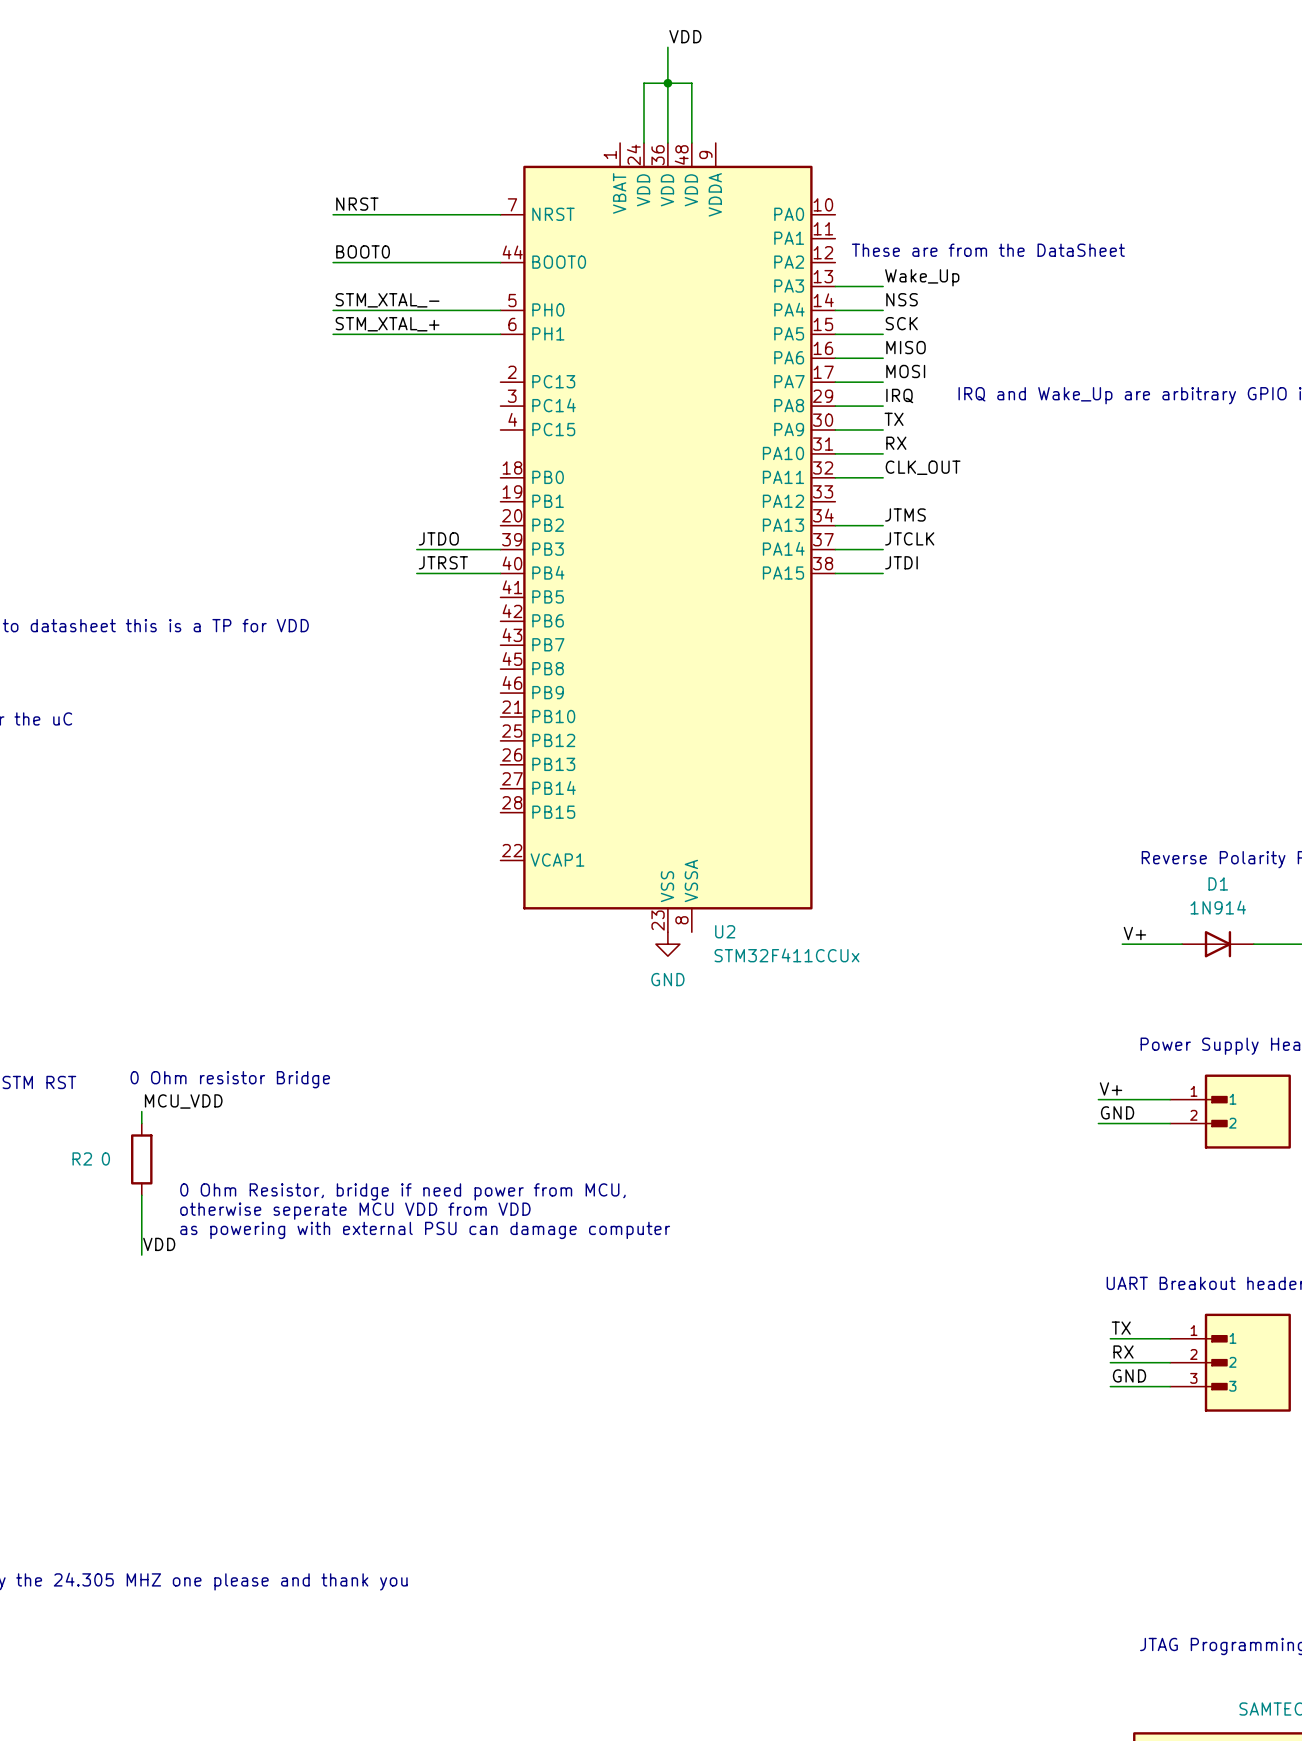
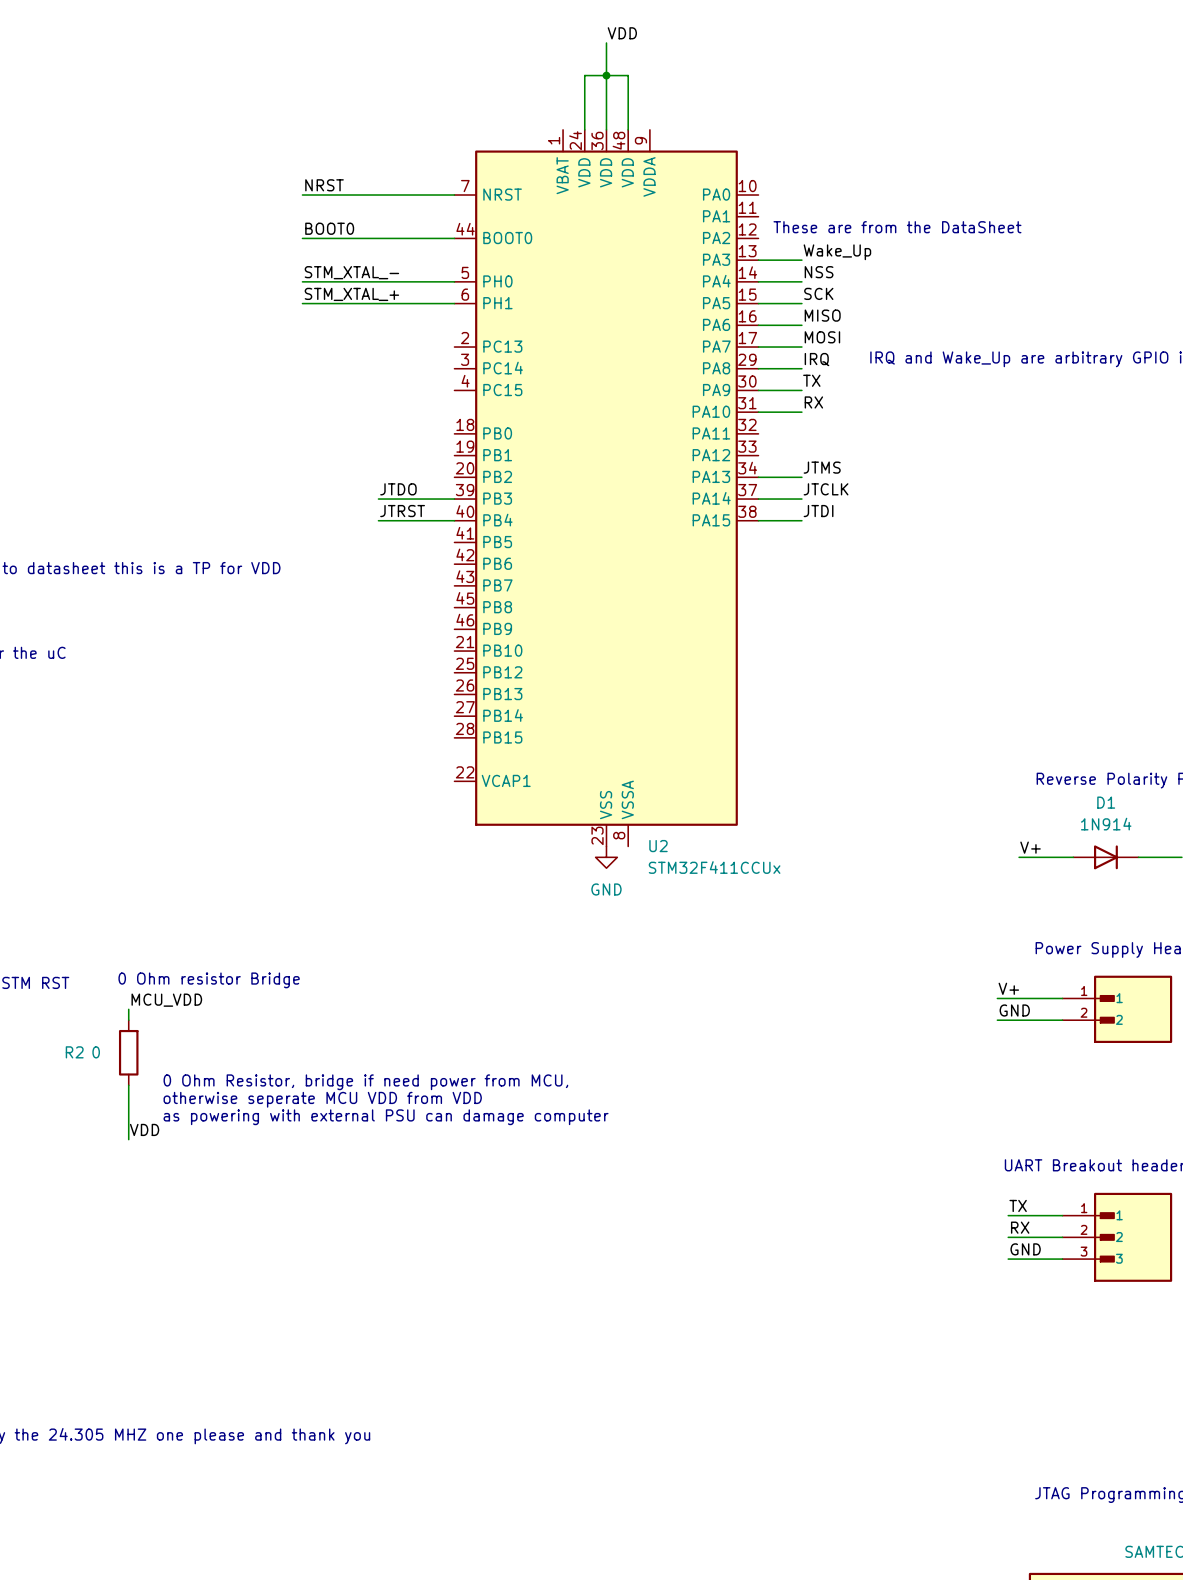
label: CLK_OUT (923, 467) -> none
wire: (835, 477) (883, 477) -> none

